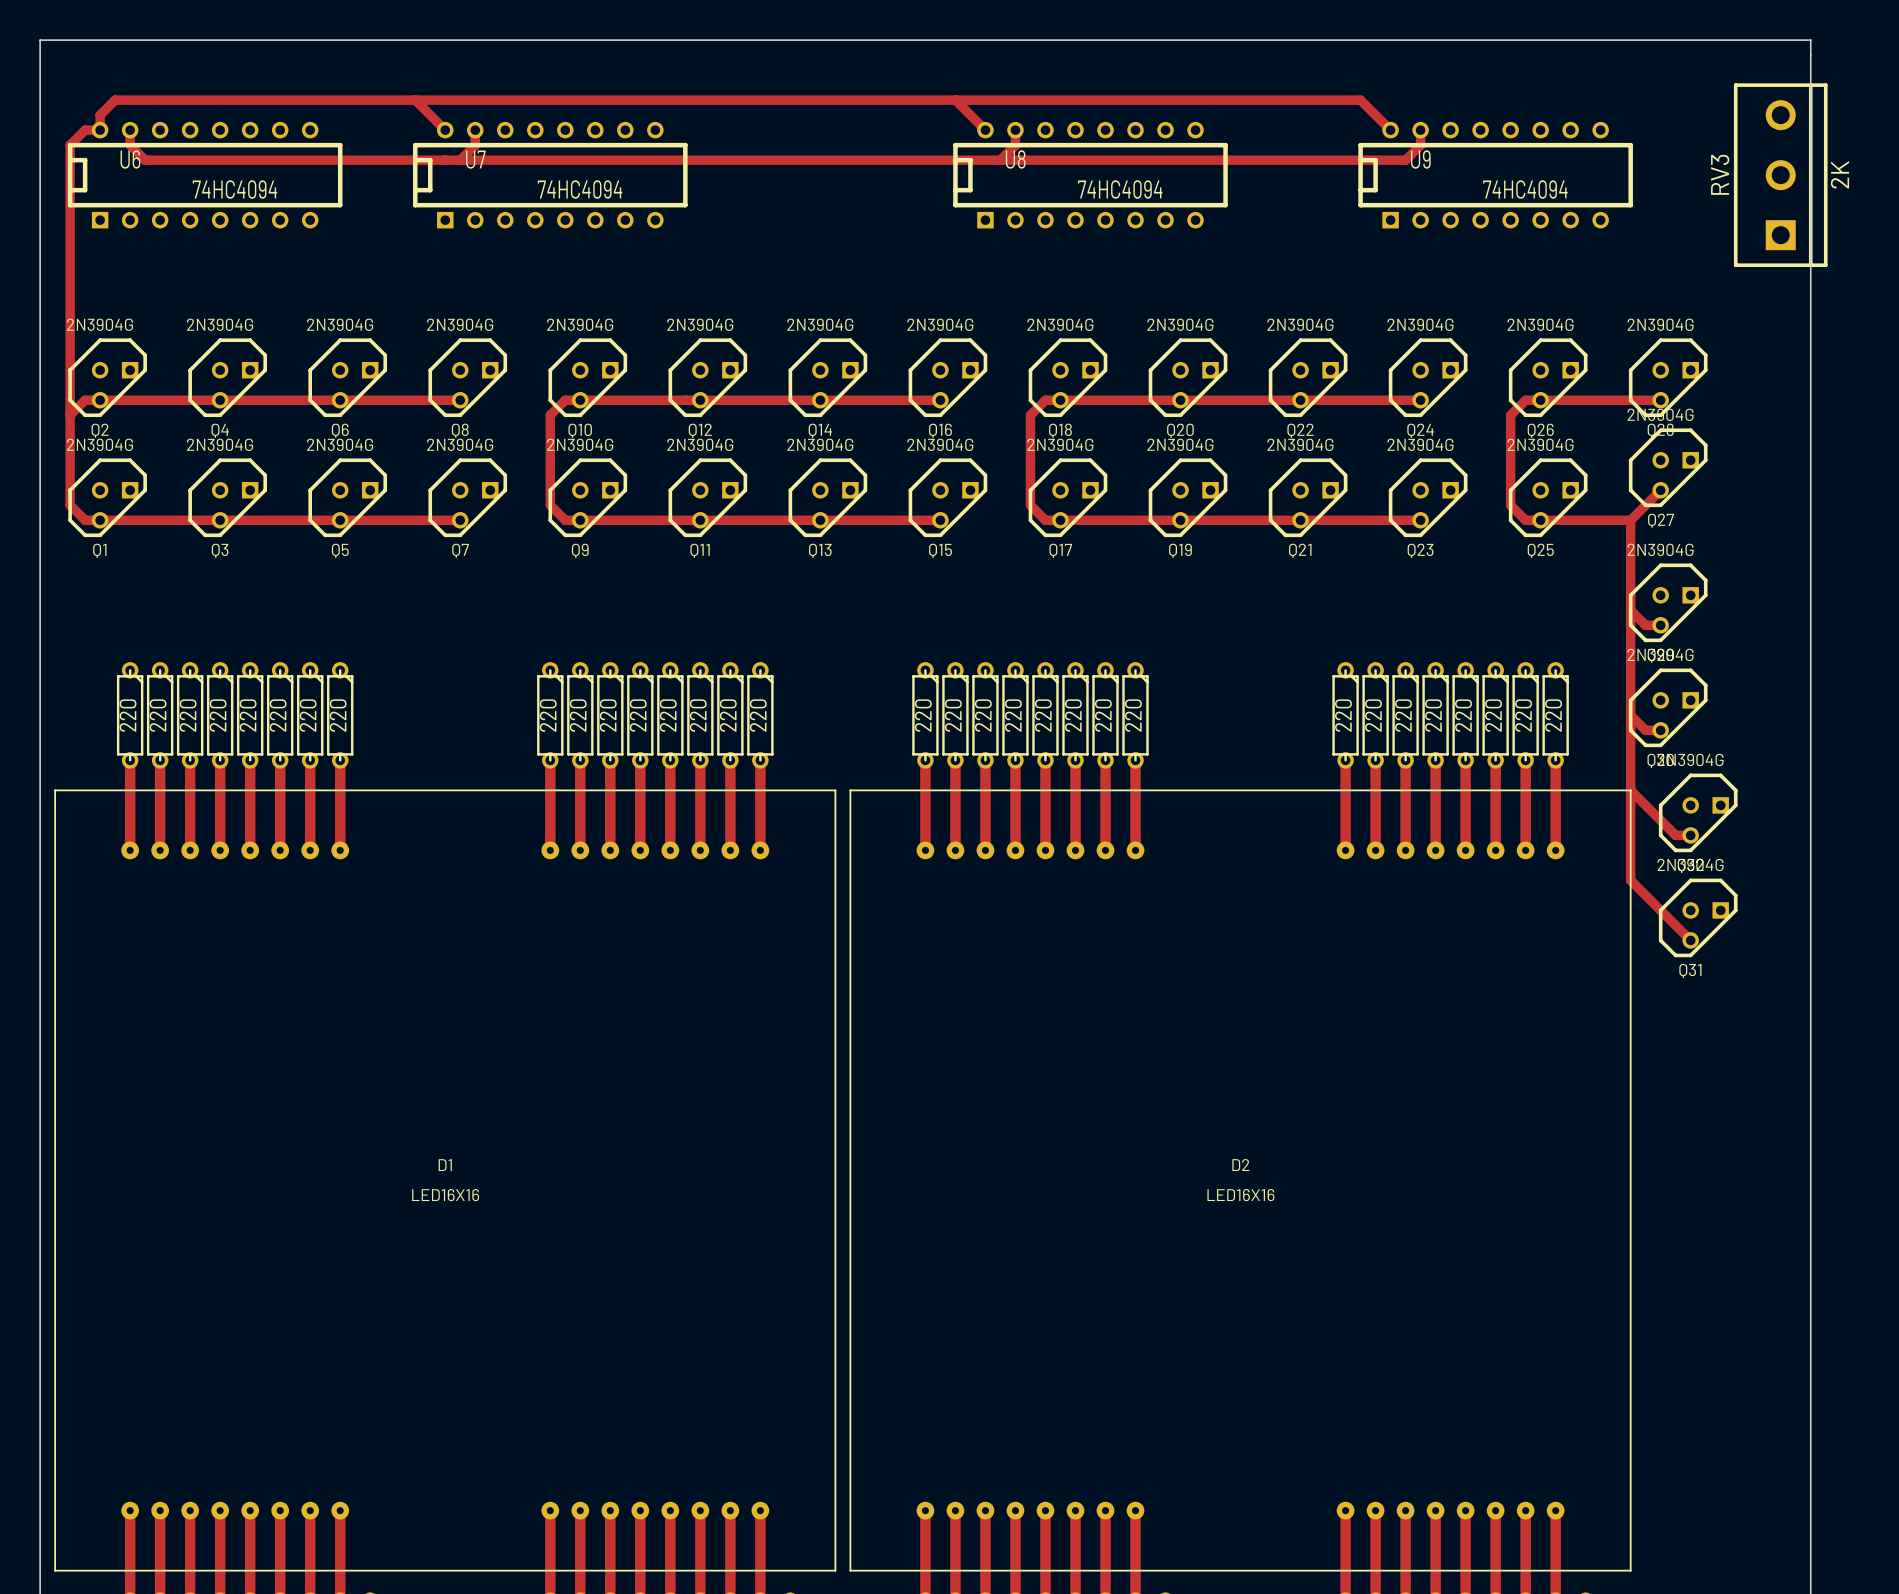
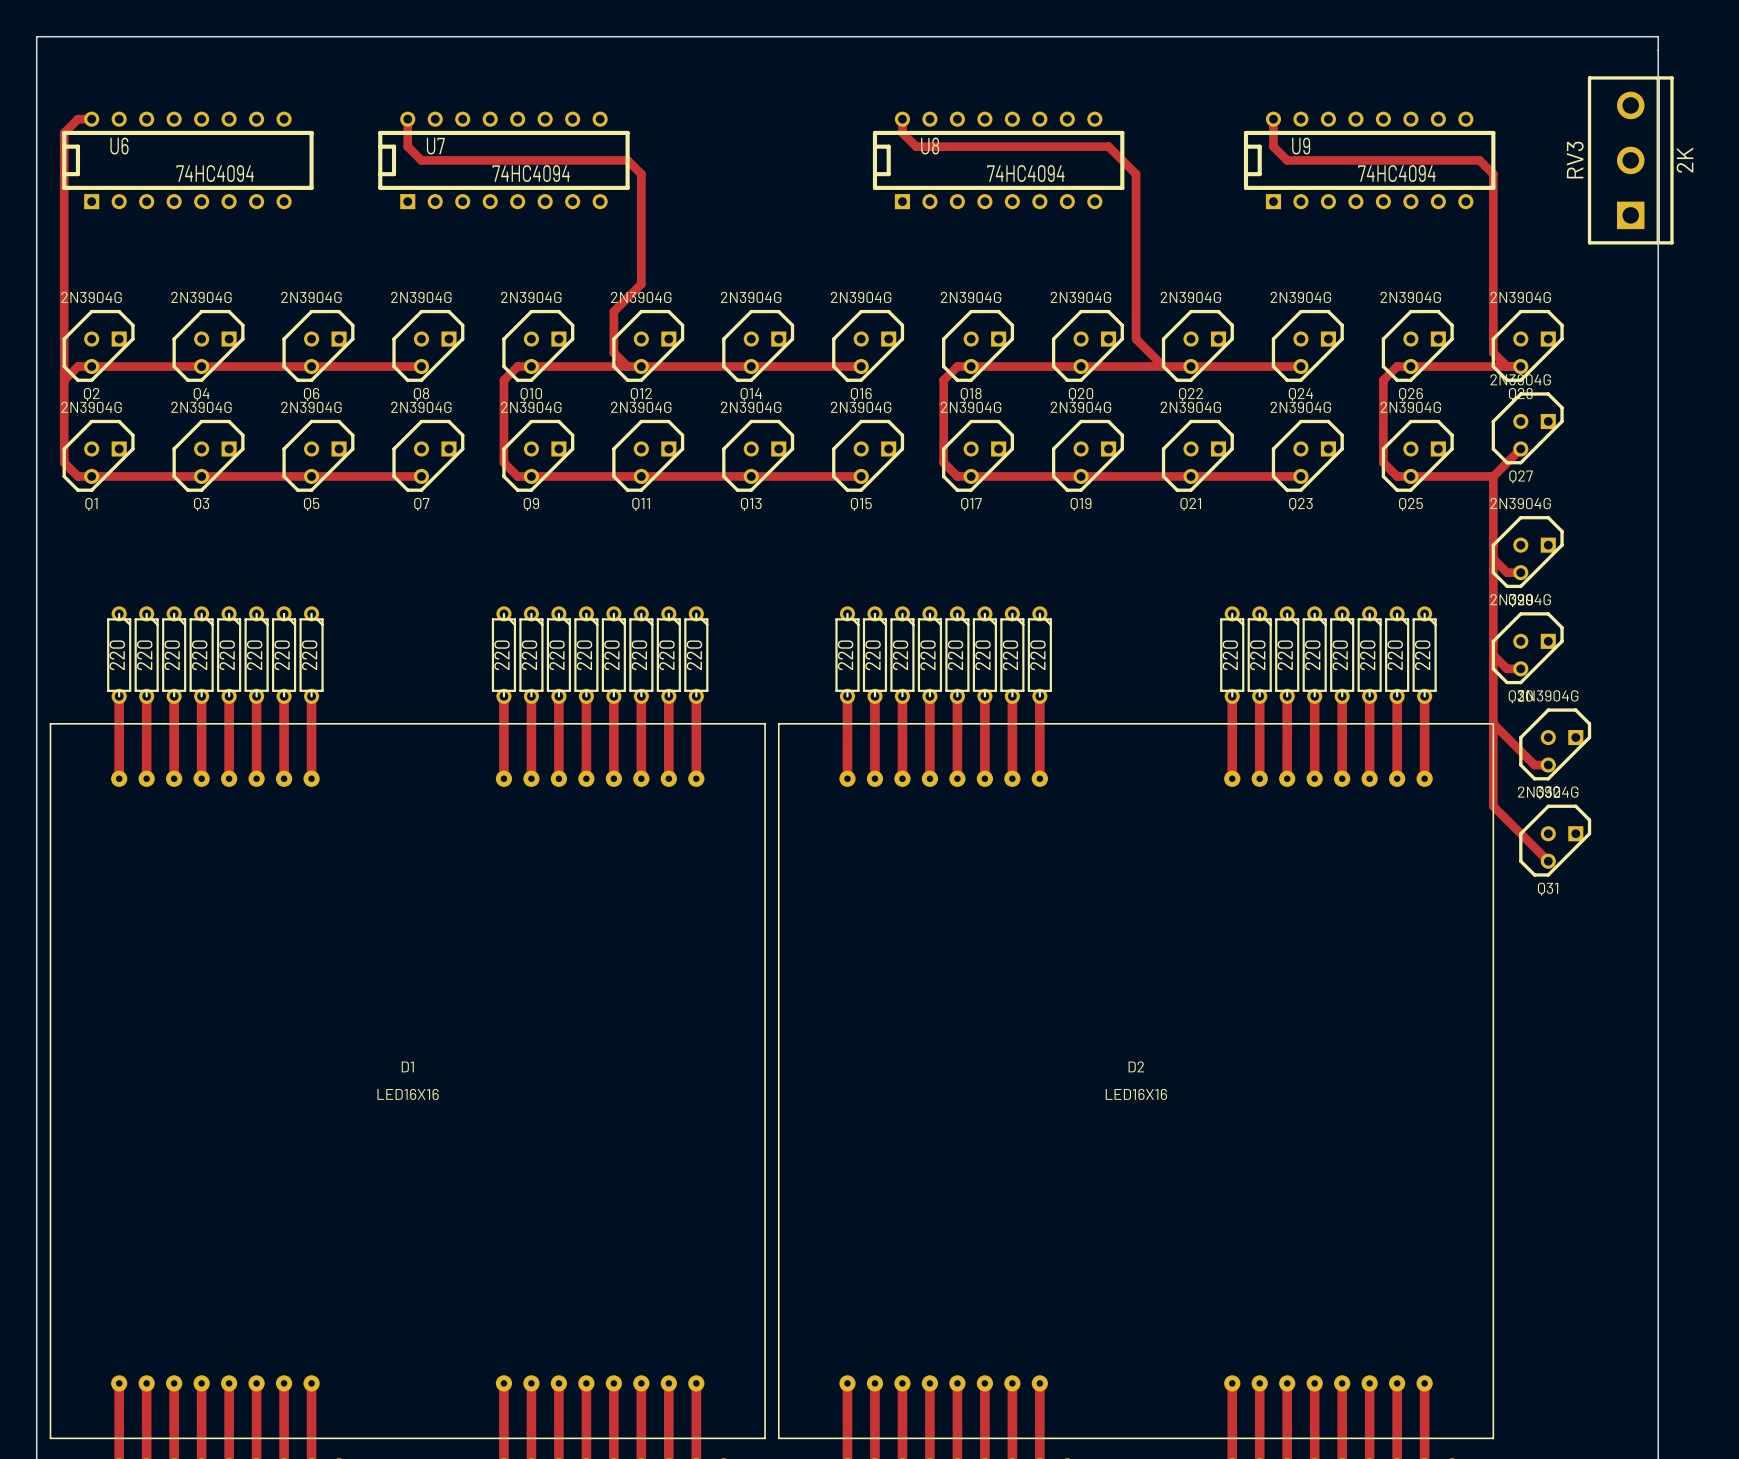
track: (415, 100) (445, 130) -> (627, 366) (613, 352) (613, 311) (641, 284) (641, 174) (627, 160) (421, 160) (407, 146) (407, 119)
track: (955, 100) (985, 130) -> (916, 146) (902, 132) (902, 119)
track: (100, 130) (100, 115) (115, 100) (1360, 100) (1390, 130) -> (1507, 366) (1493, 352) (1493, 174) (1479, 160) (1287, 160) (1273, 146) (1273, 119)
track: (130, 130) (130, 145) (145, 160) (1000, 160) (1015, 145) (1015, 130) -> none
track: (475, 130) (475, 145) (460, 160) -> none
track: (1420, 130) (1420, 145) (1405, 160) (1210, 160) -> (1163, 366) (1136, 339) (1136, 174) (1108, 146)

